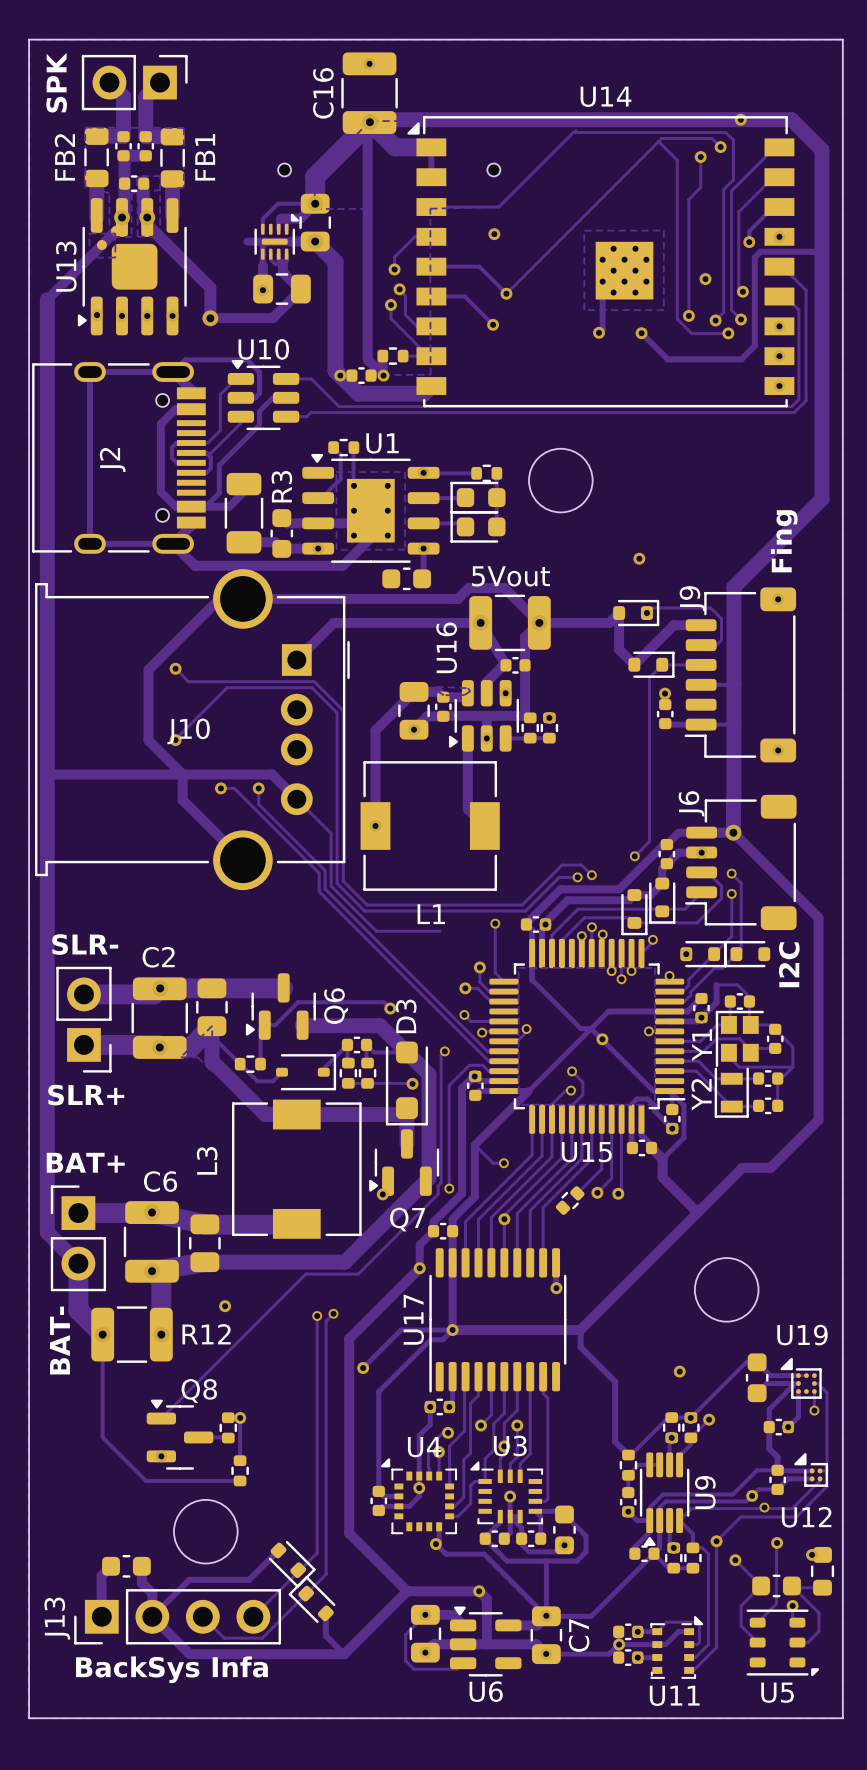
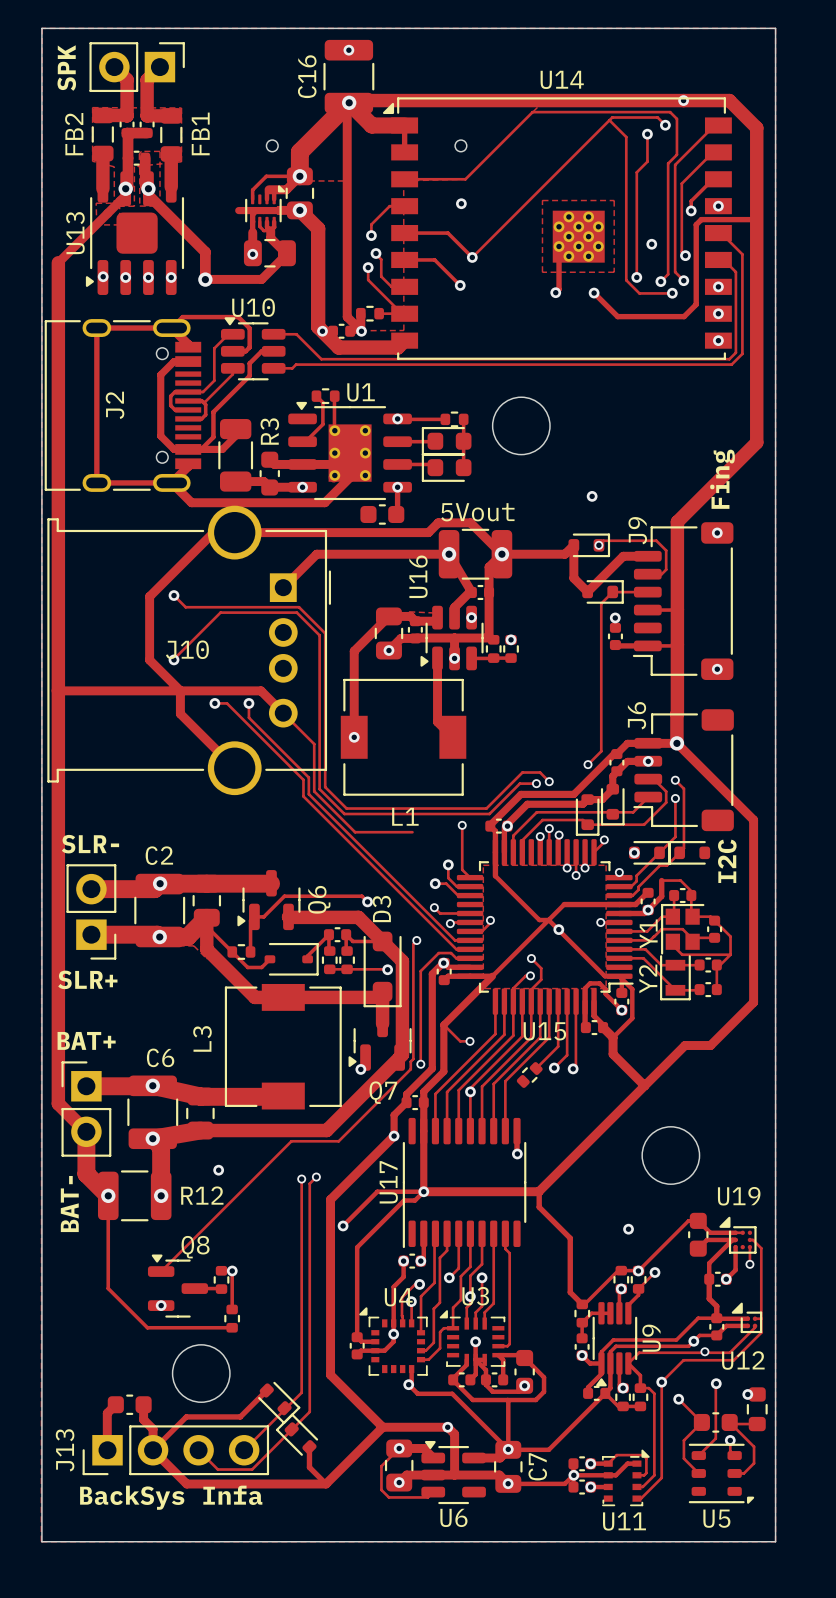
zone outline: (336, 472) (336, 549) (405, 549) (405, 472) (336, 472) -> none

